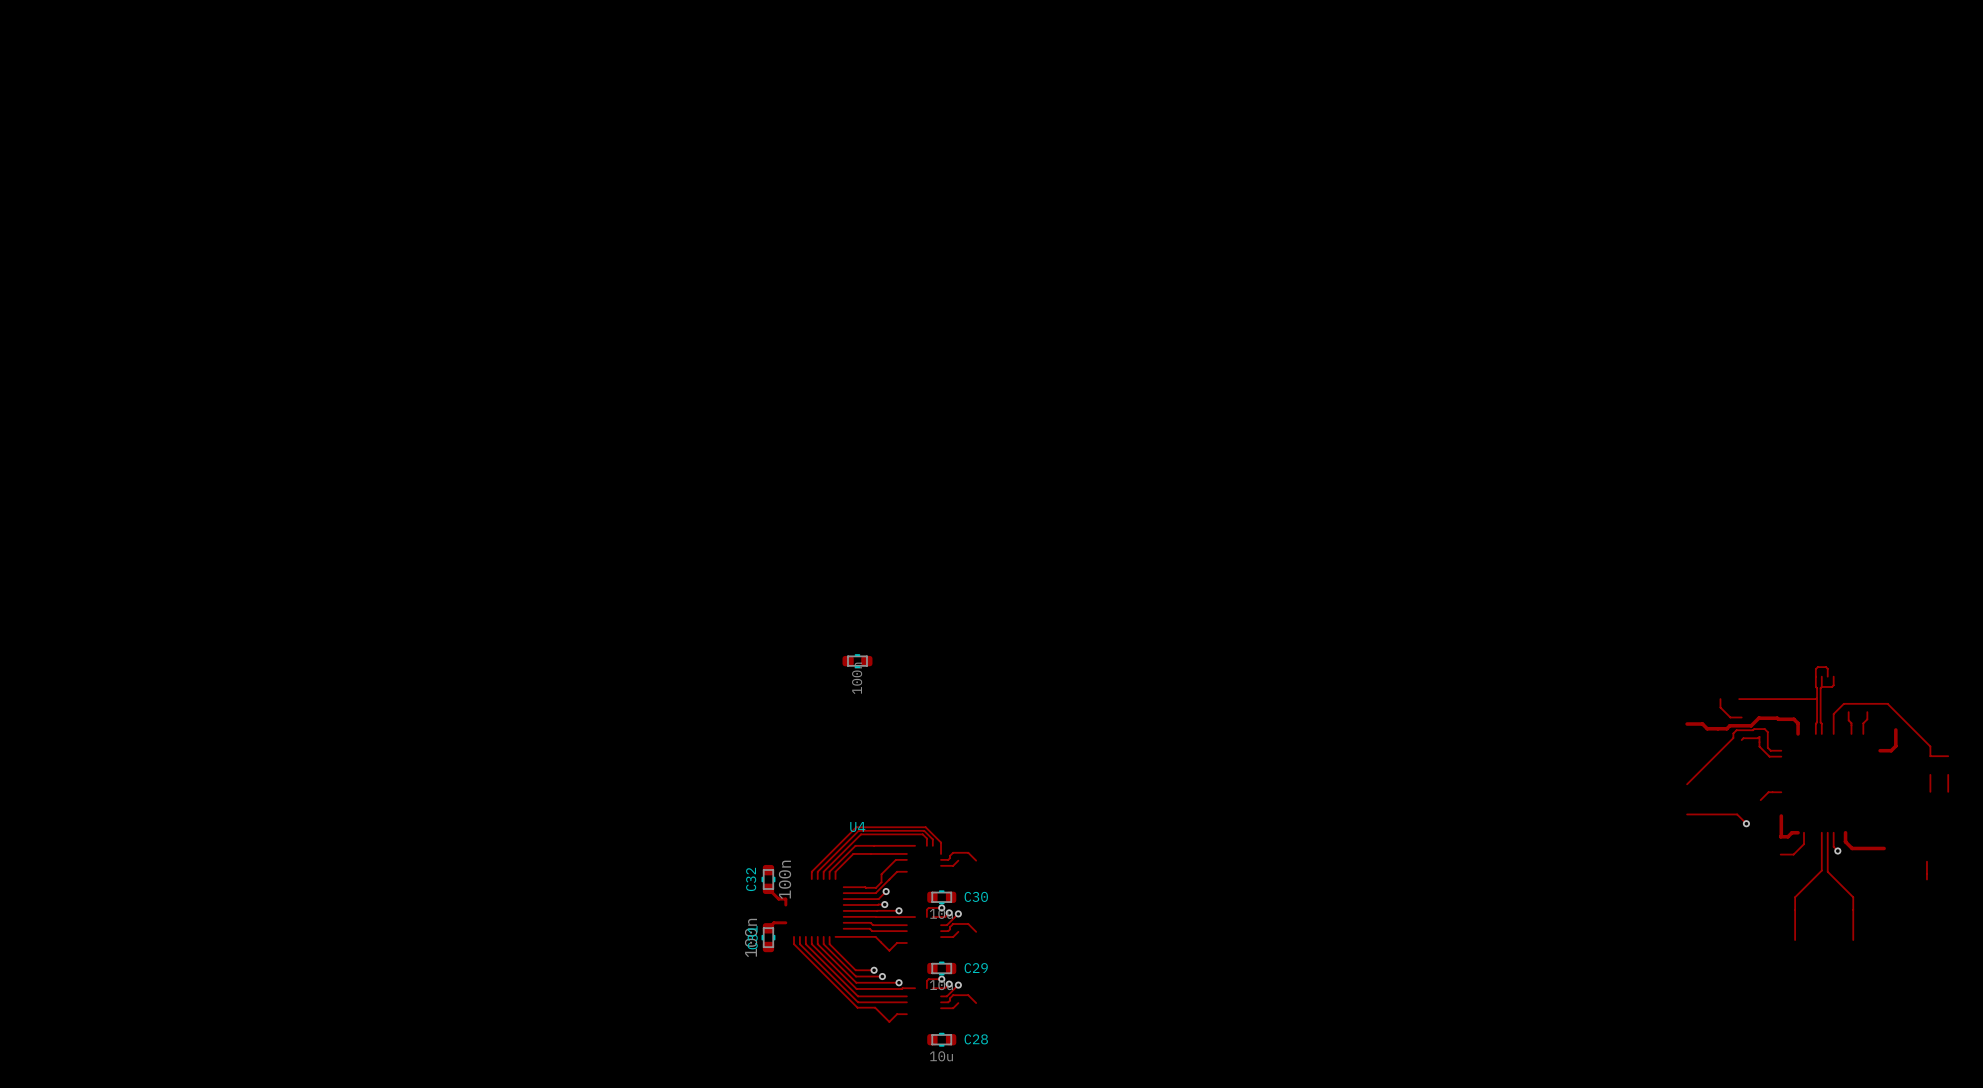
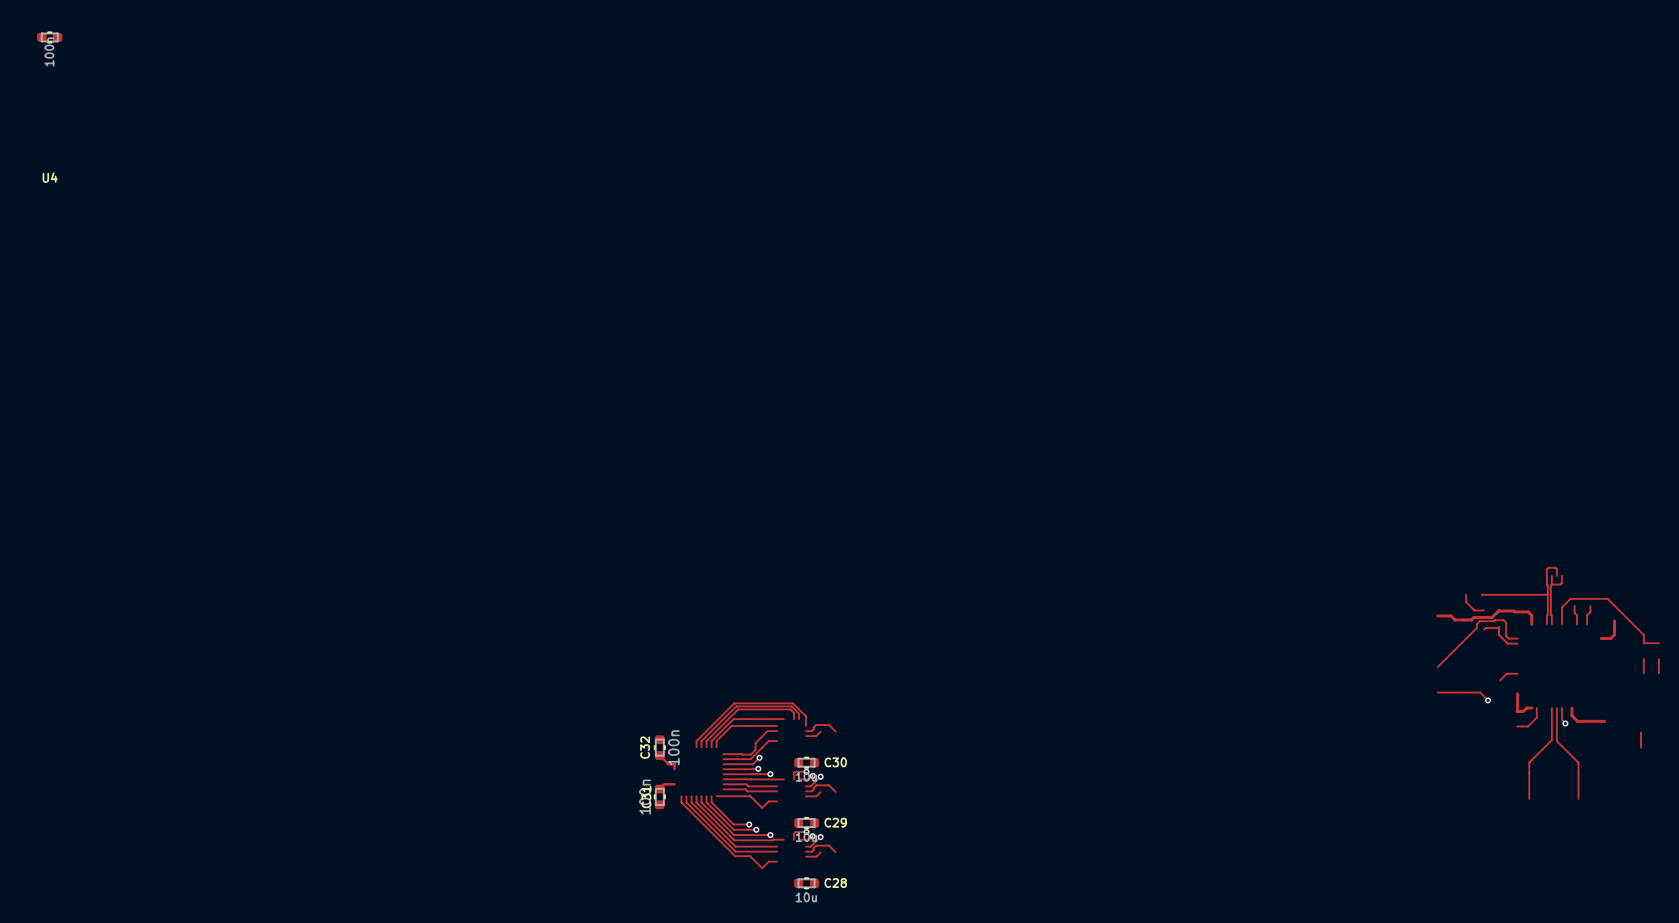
U4 position: (857, 661) -> (49, 37)

